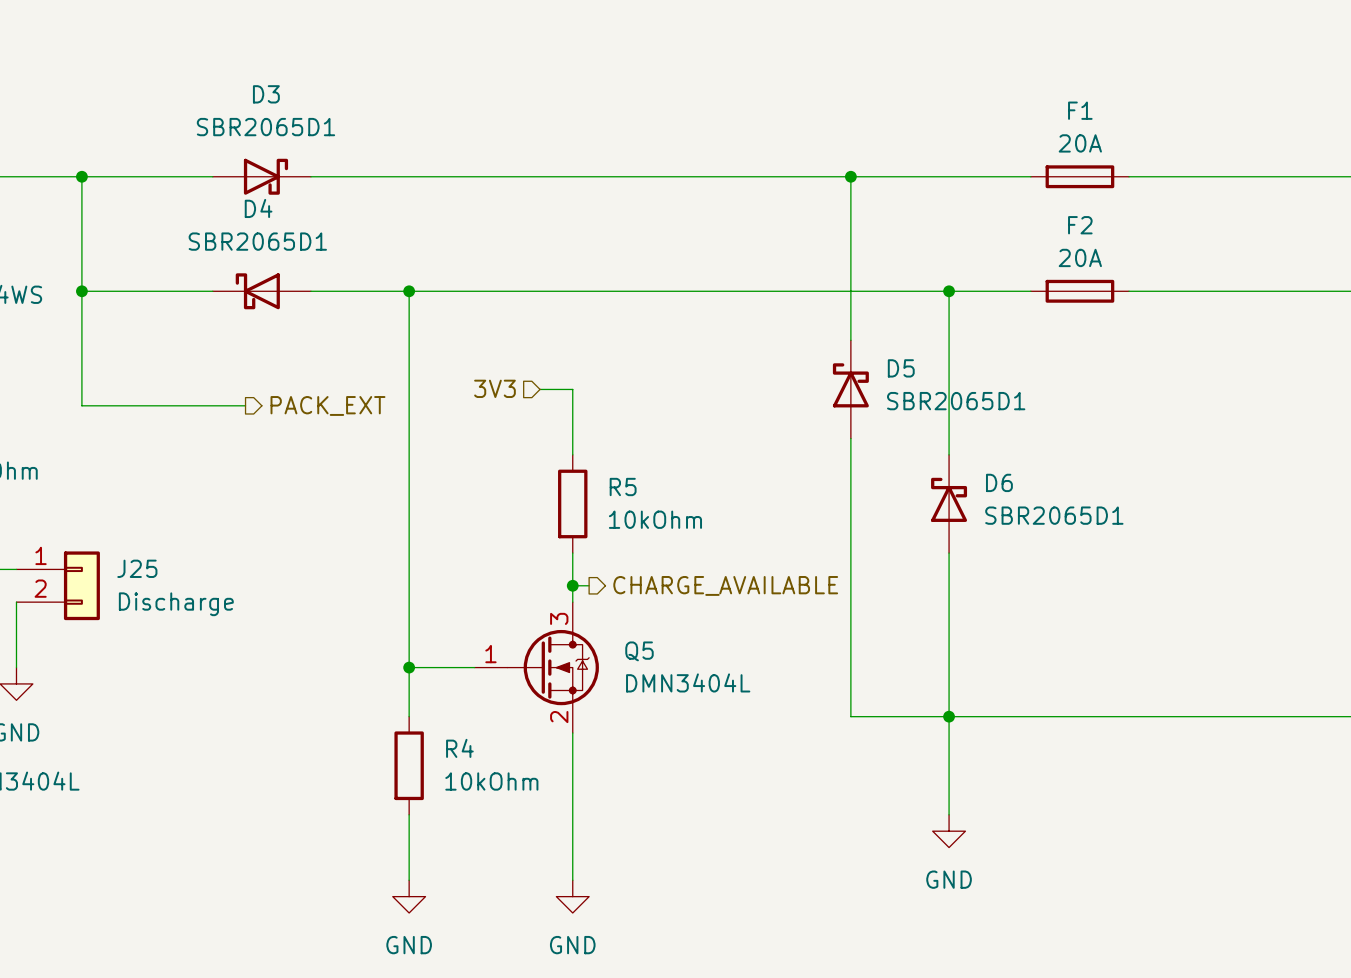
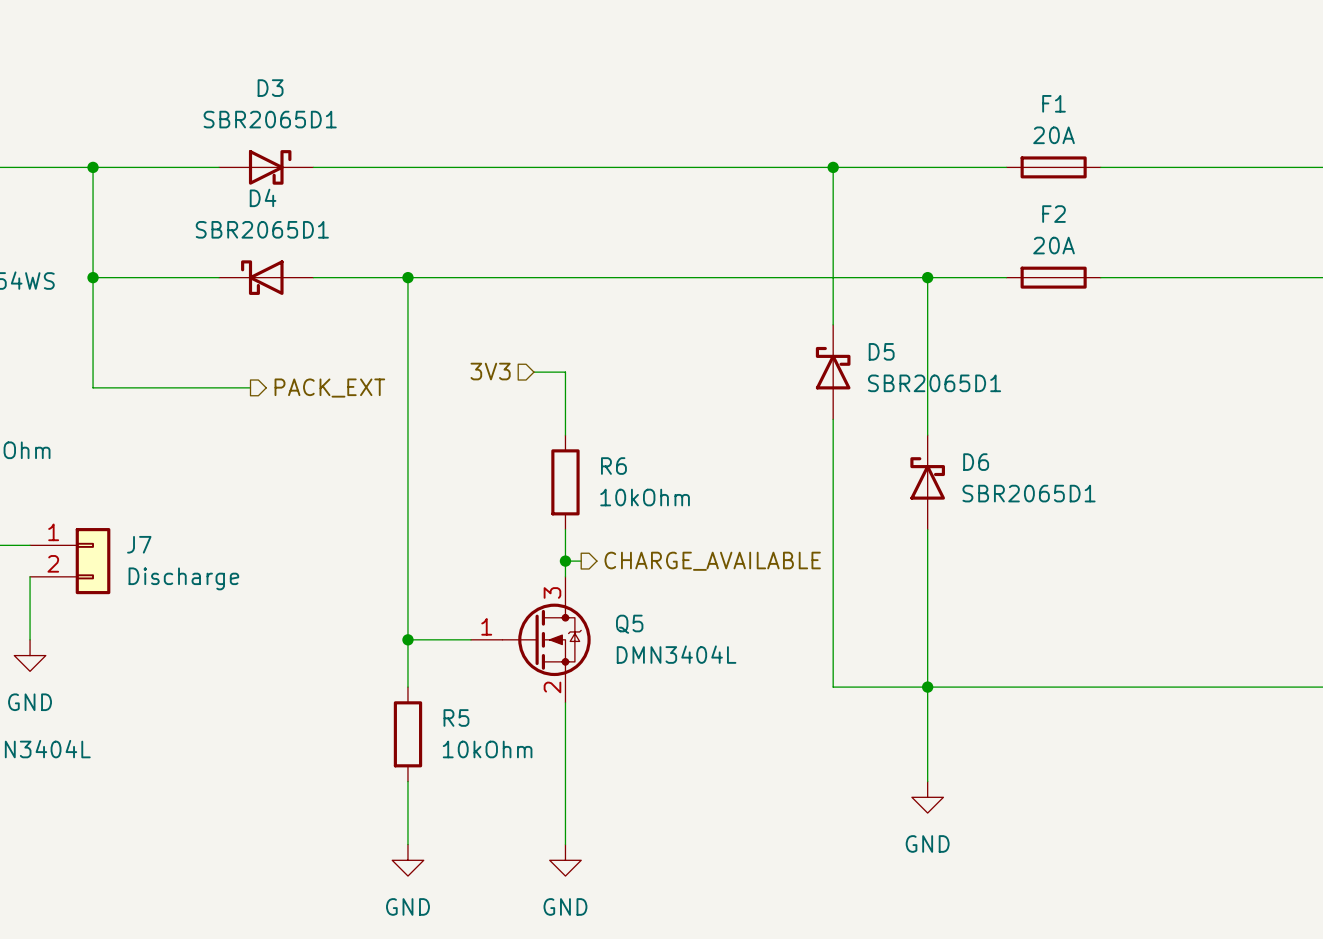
R5 name: R5 (623, 487) -> R6 (613, 466)
J25 name: J25 (137, 568) -> J7 (139, 544)
R4 name: R4 (459, 748) -> R5 (456, 717)

